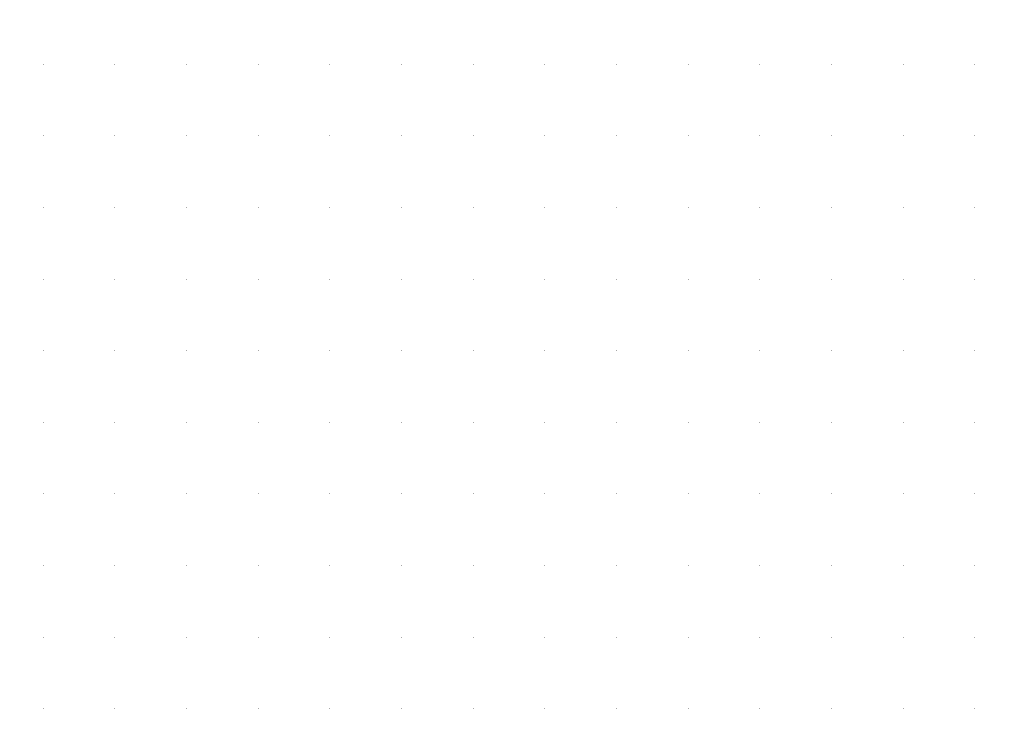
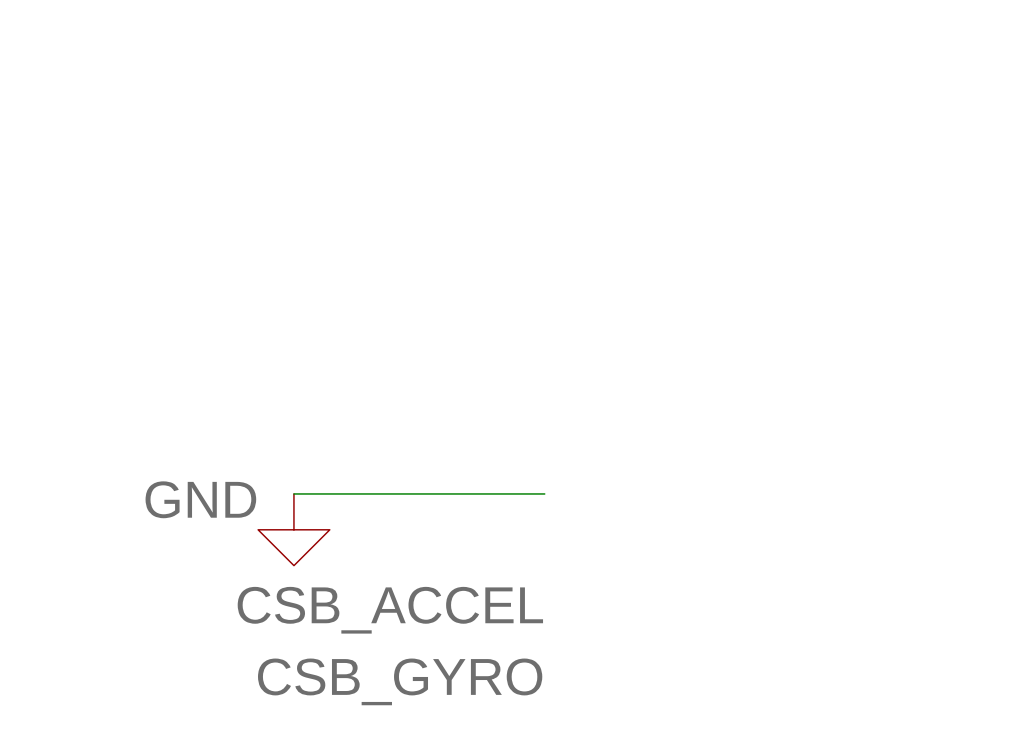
wire: none -> (293, 493) (544, 493)
power symbol: none -> GND (293, 529)
label: none -> CSB_ACCEL (390, 610)
label: none -> CSB_GYRO (400, 681)

